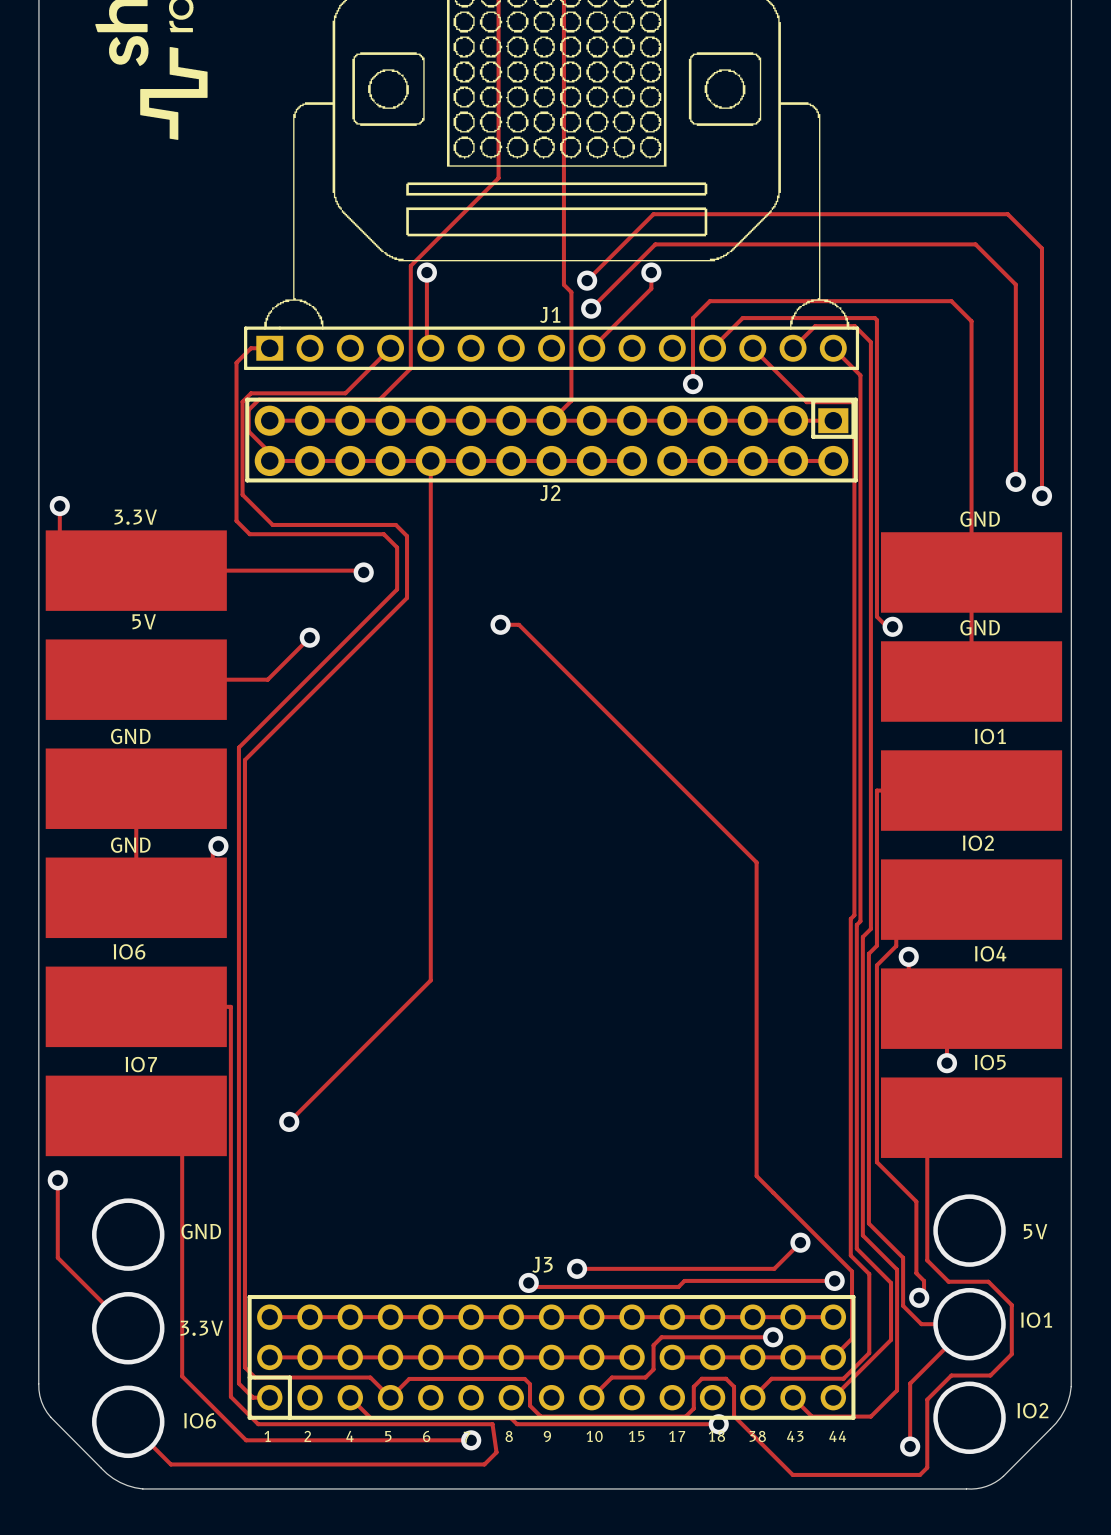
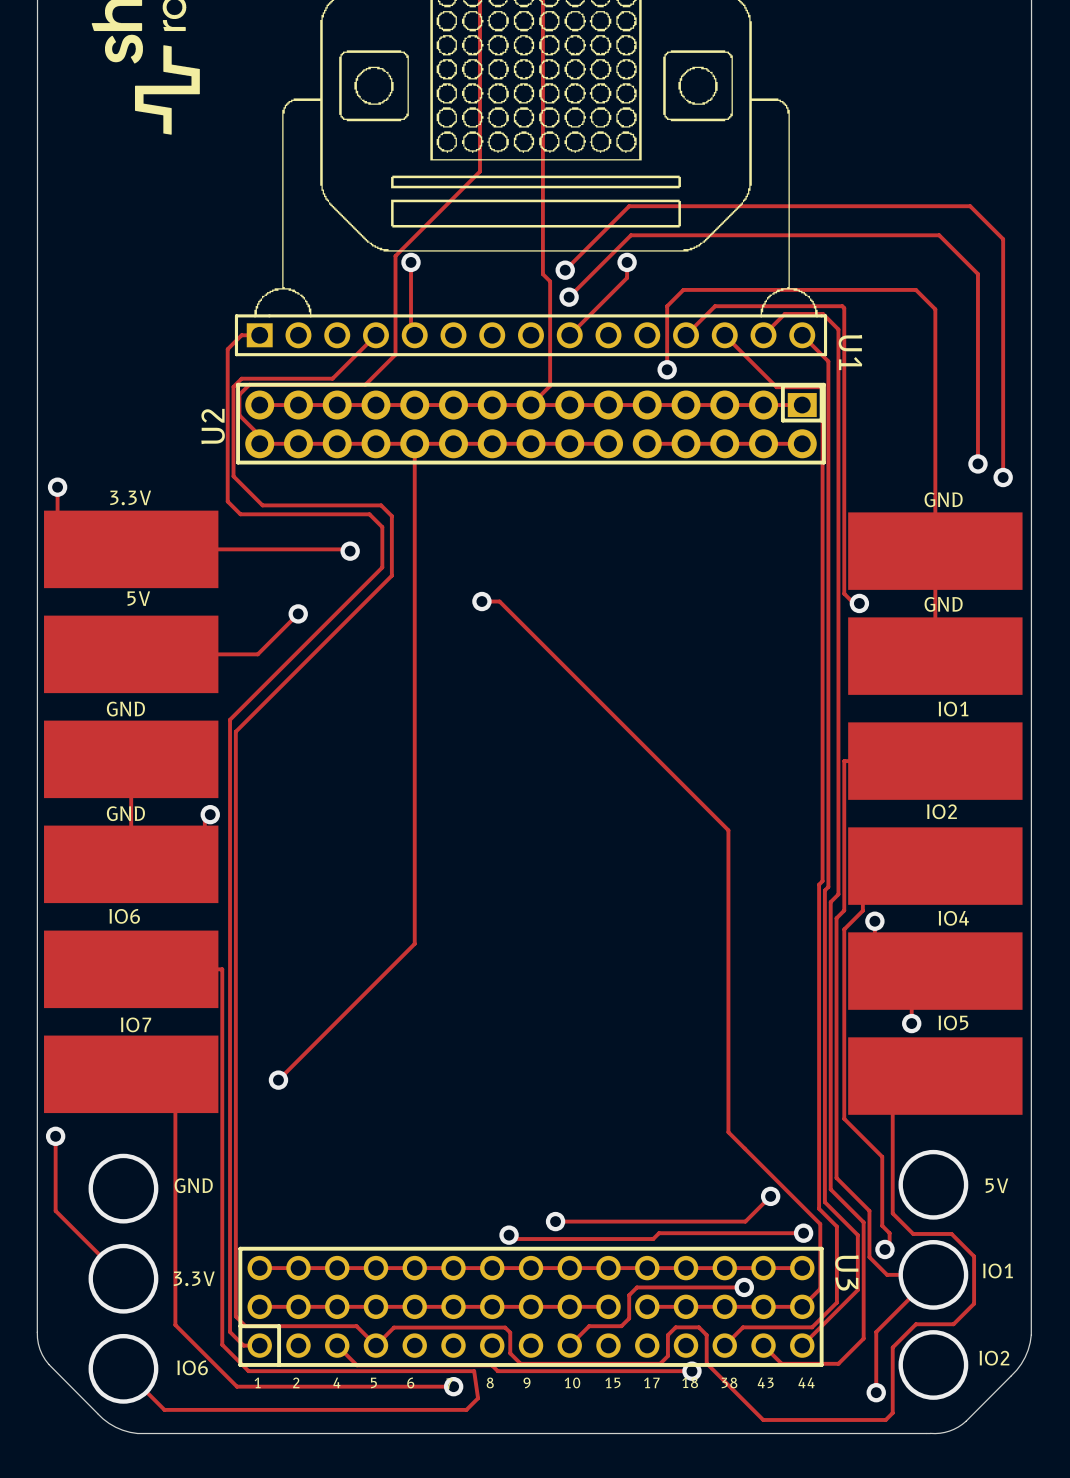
J1 name: J1 (550, 314) -> U1 (850, 352)
J2 name: J2 (550, 493) -> U2 (213, 426)
J3 name: J3 (542, 1264) -> U3 (846, 1272)

